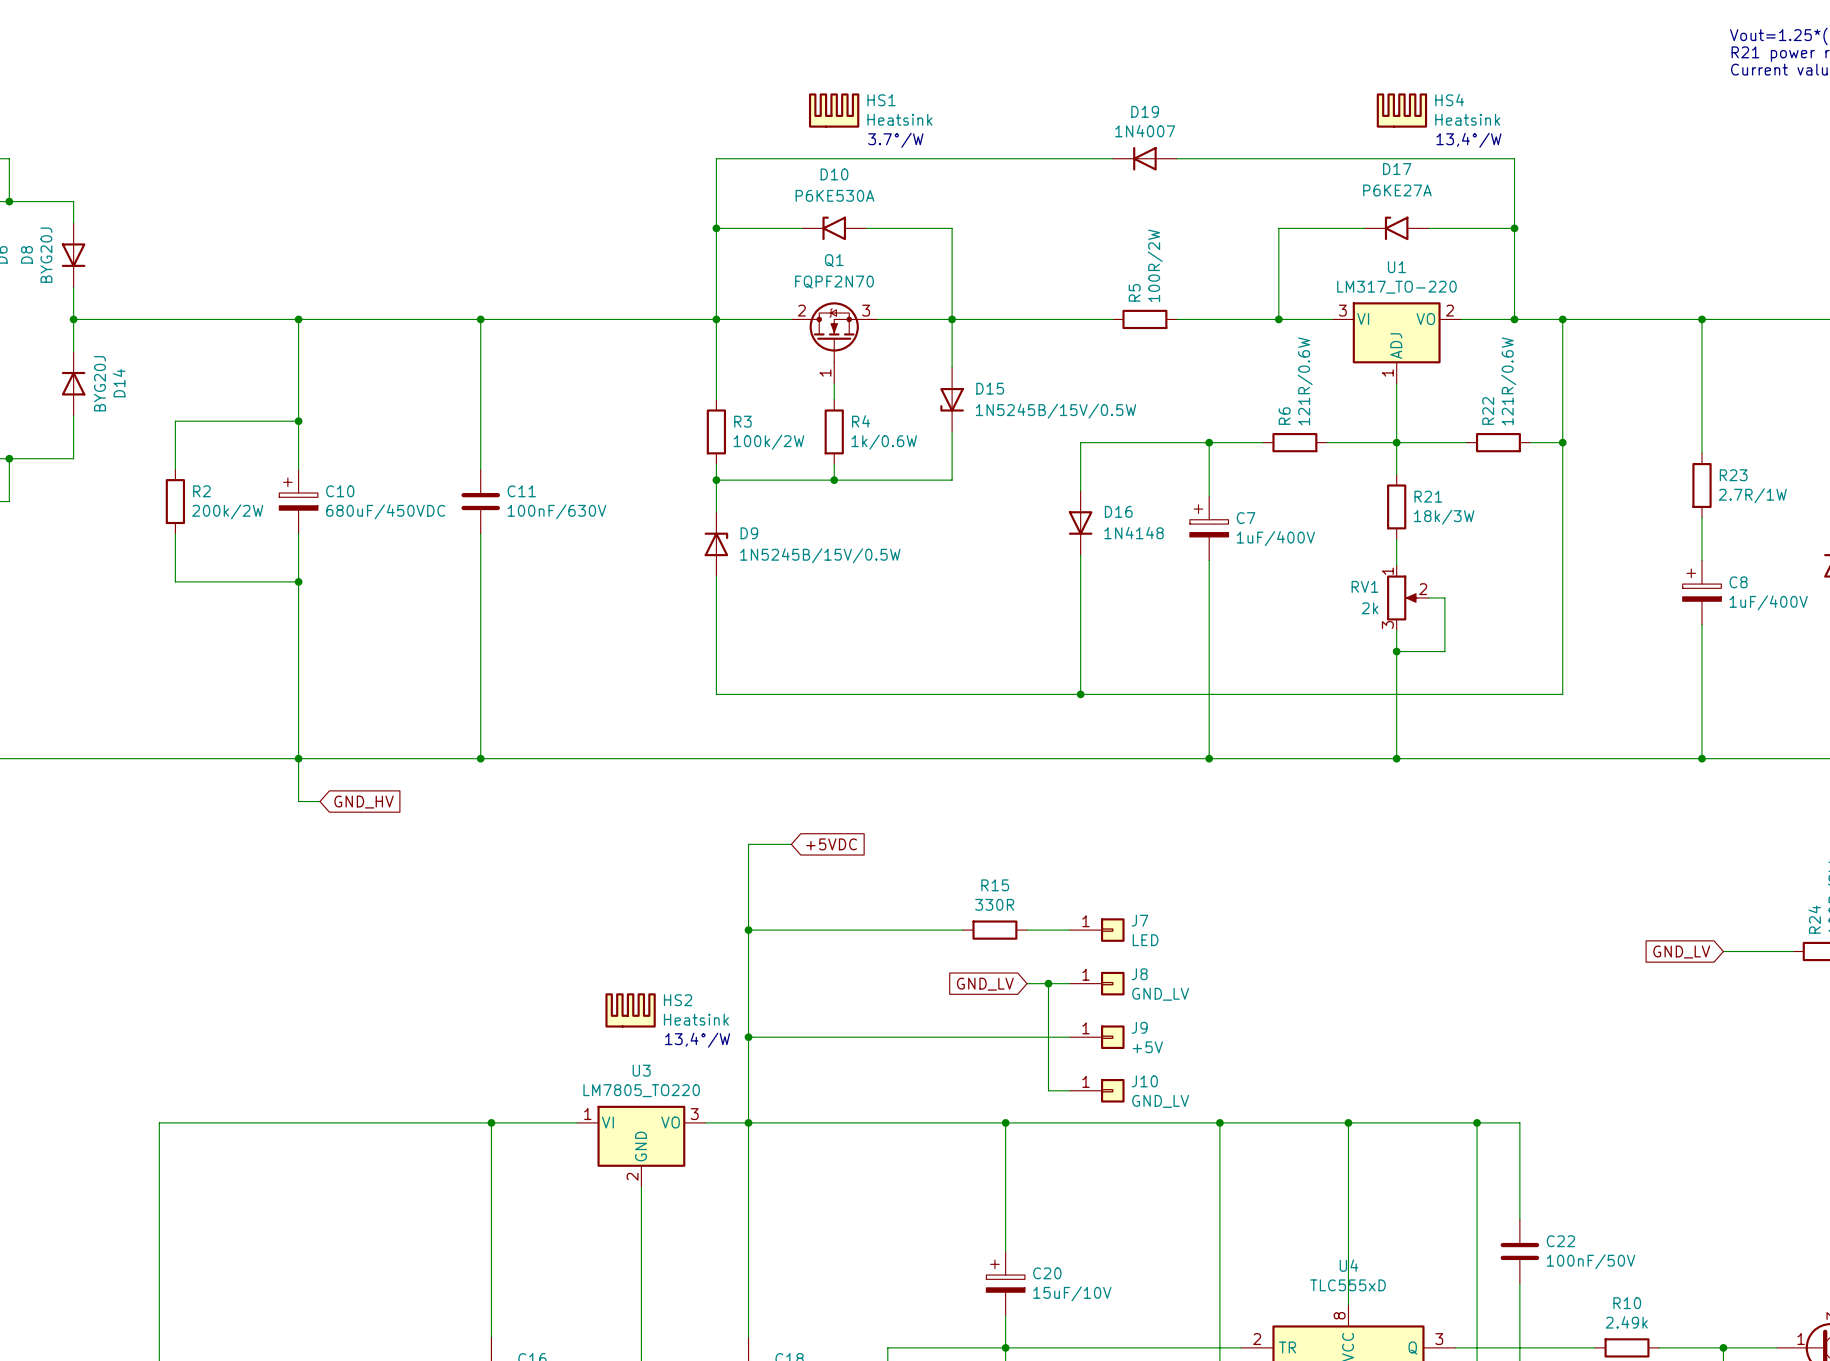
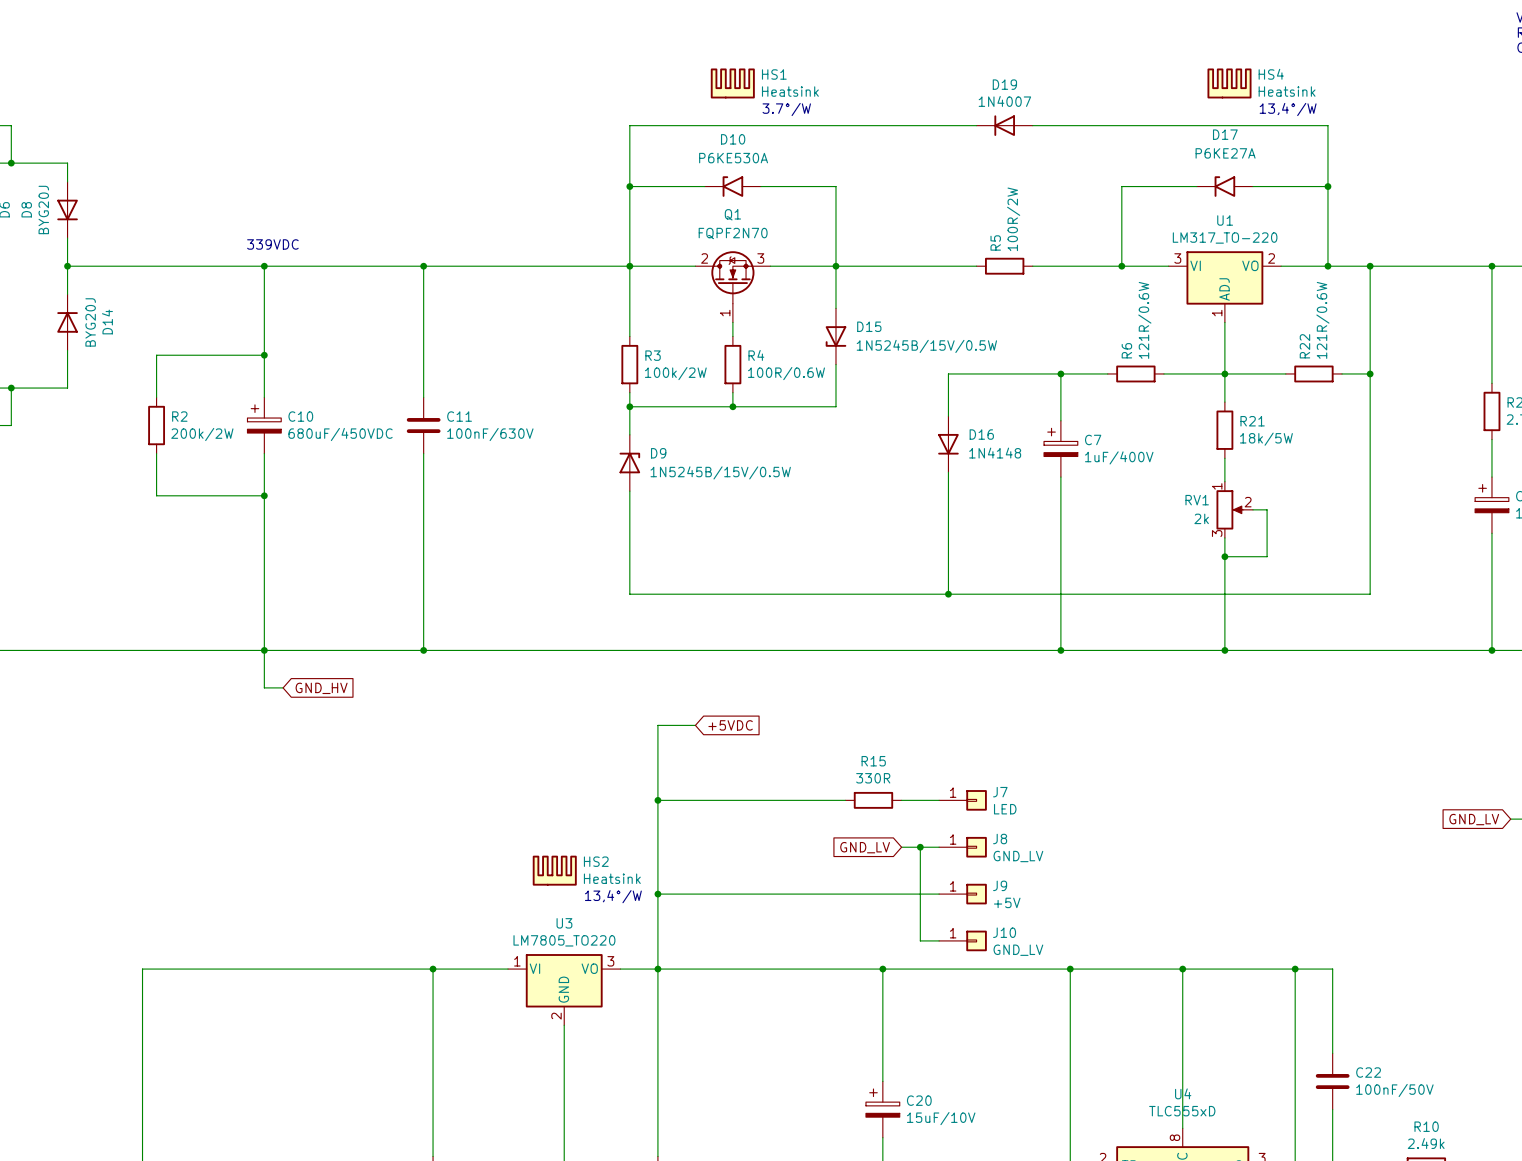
text: none -> 339VDC (272, 244)
R4 value: 1k/0.6W (884, 442) -> 100R/0.6W (786, 373)
R21 value: 18k/3W (1444, 517) -> 18k/5W (1266, 439)

